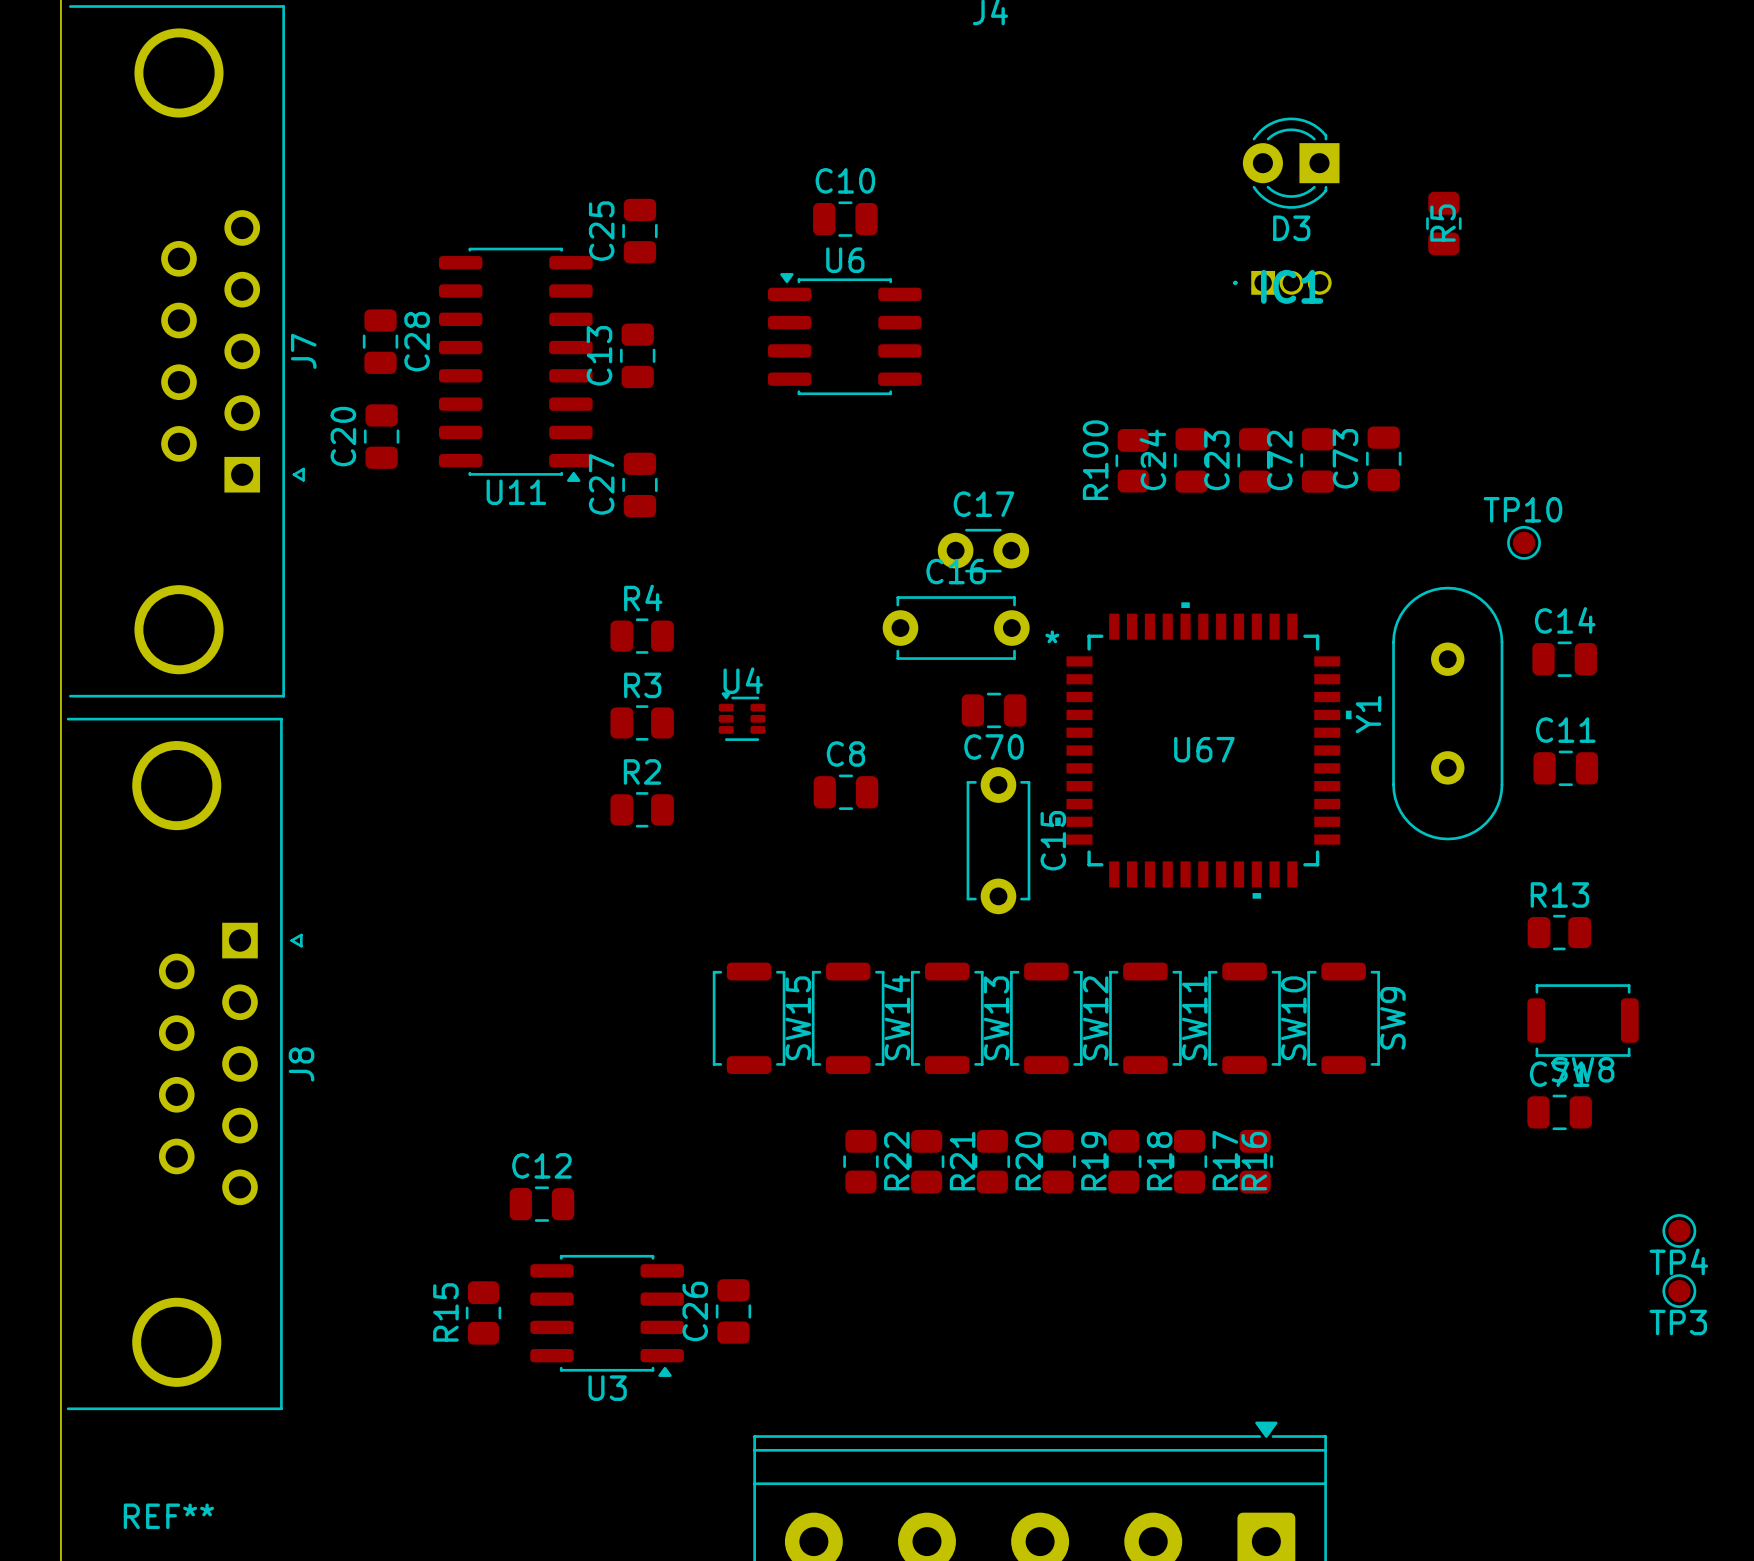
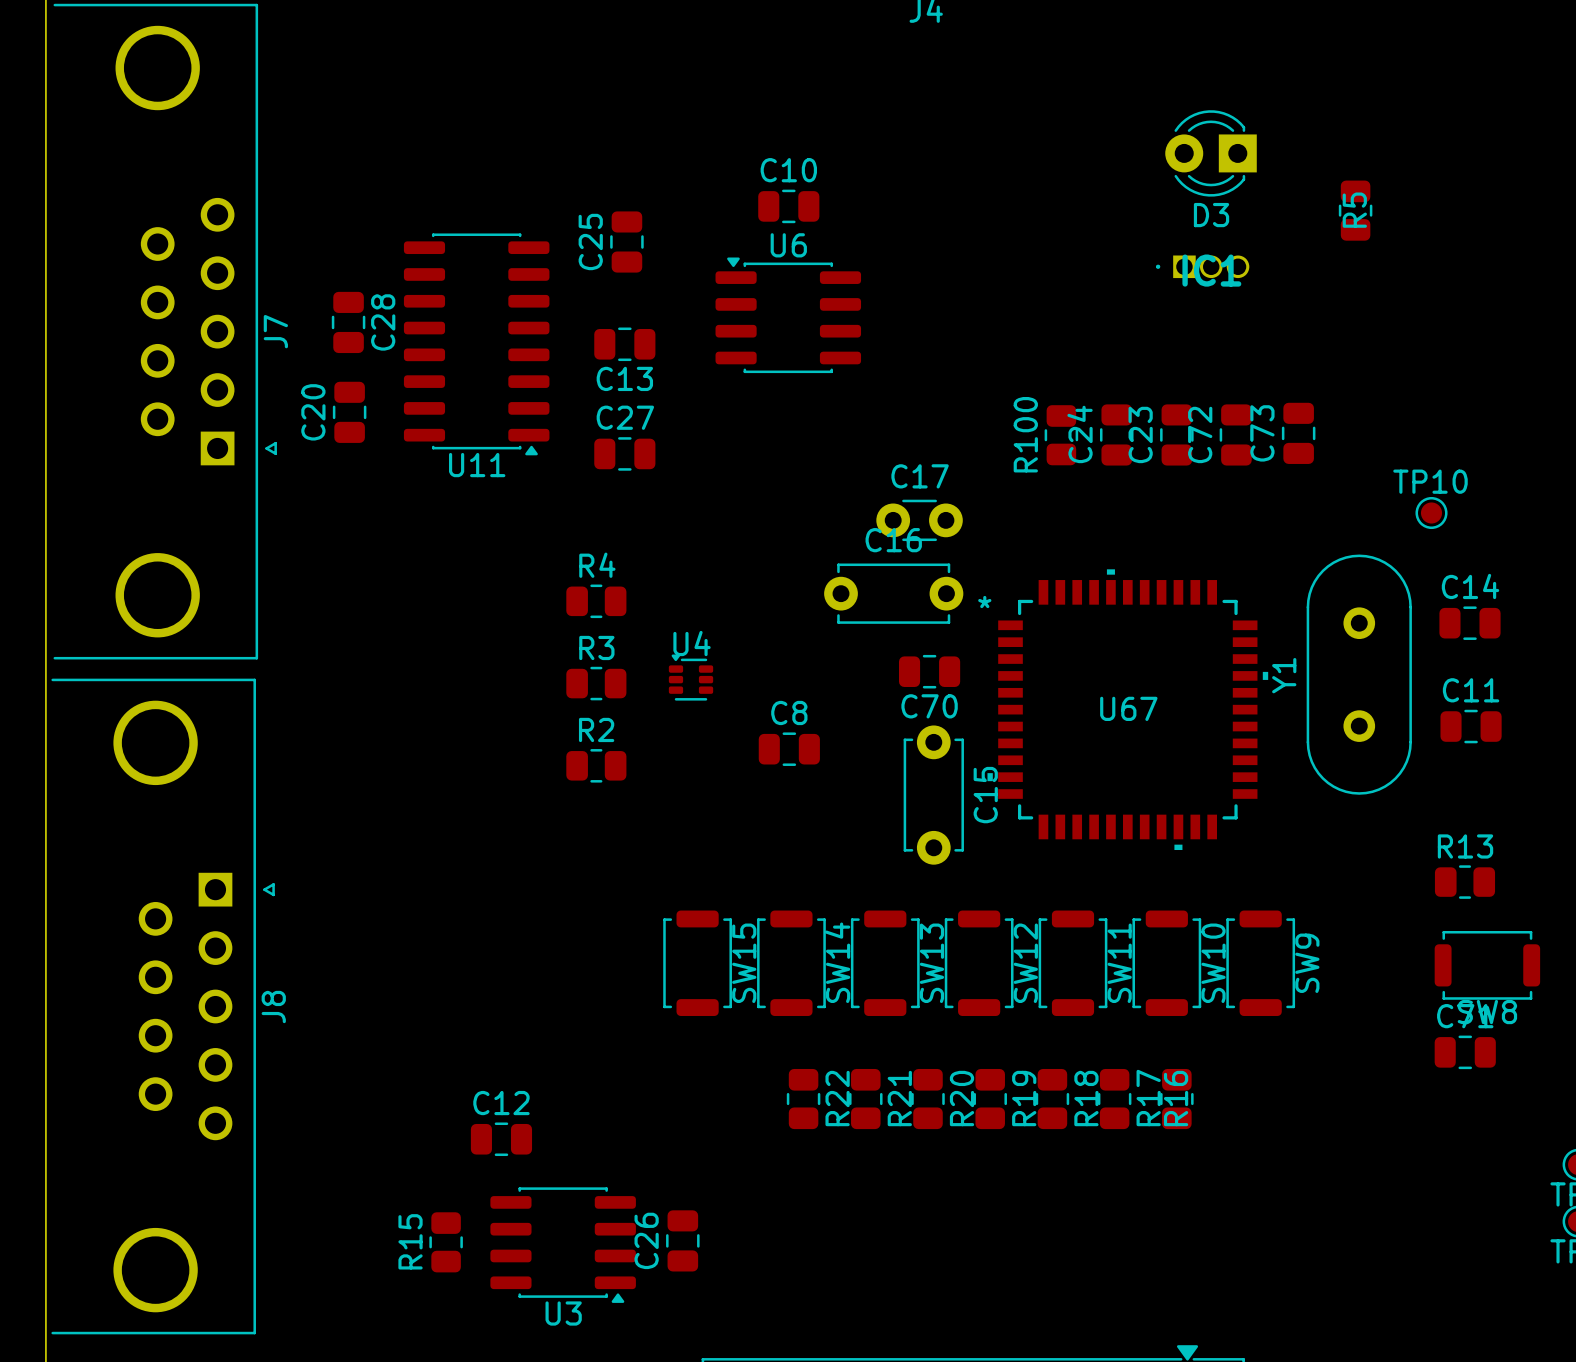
C25 position: (639, 231) -> (626, 242)
C13 name position: C13 (599, 355) -> C13 (624, 378)
C13 rotation: 0° (637, 355) -> 90° clockwise (624, 344)
C27 rotation: 0° (639, 484) -> 90° clockwise (624, 453)

